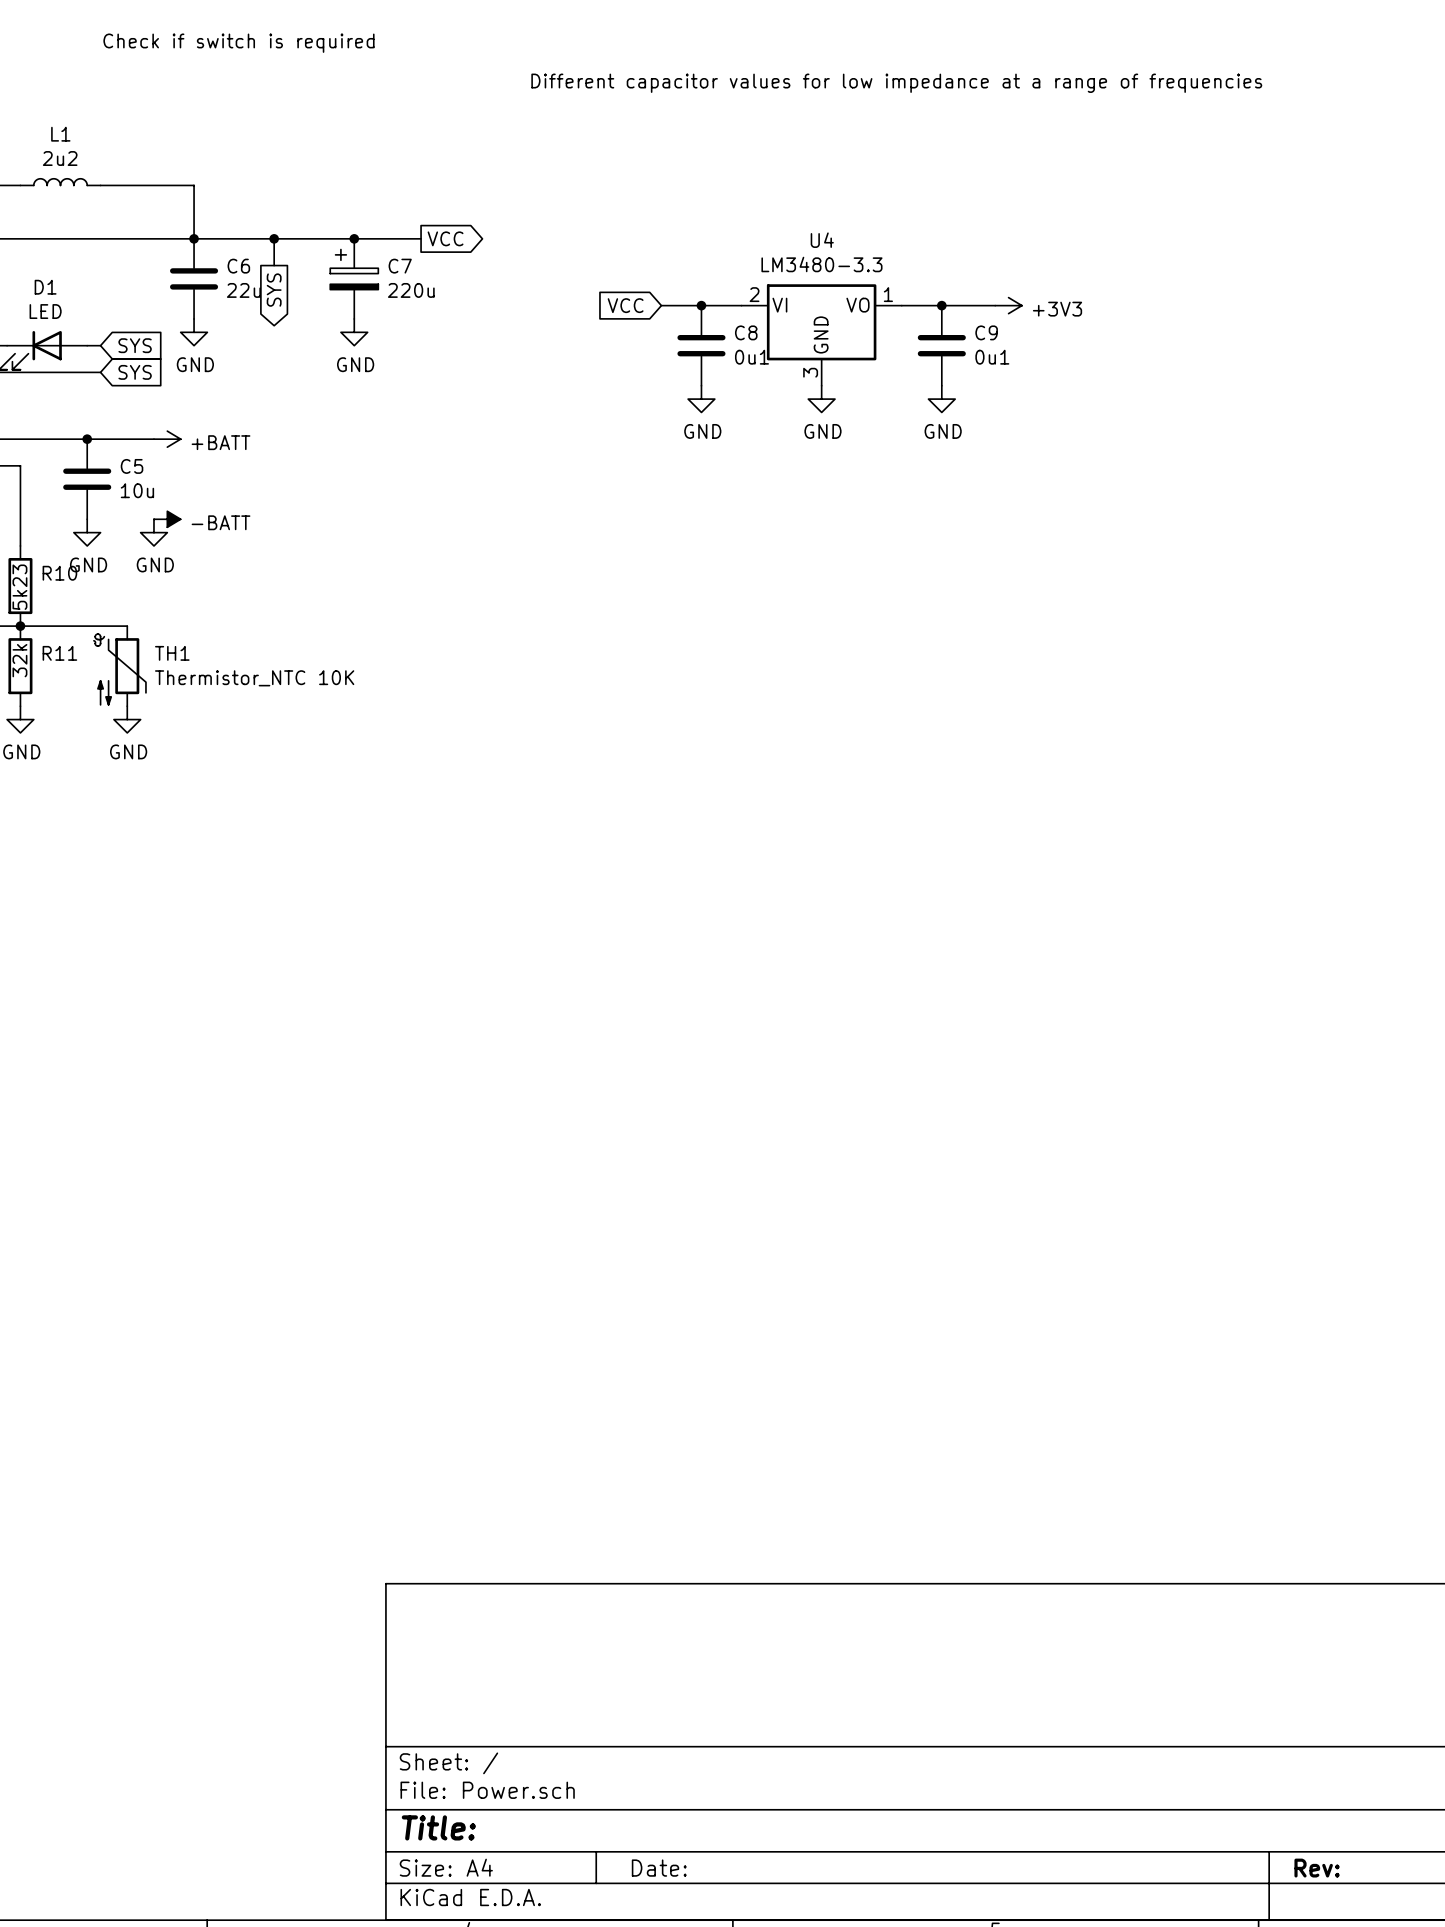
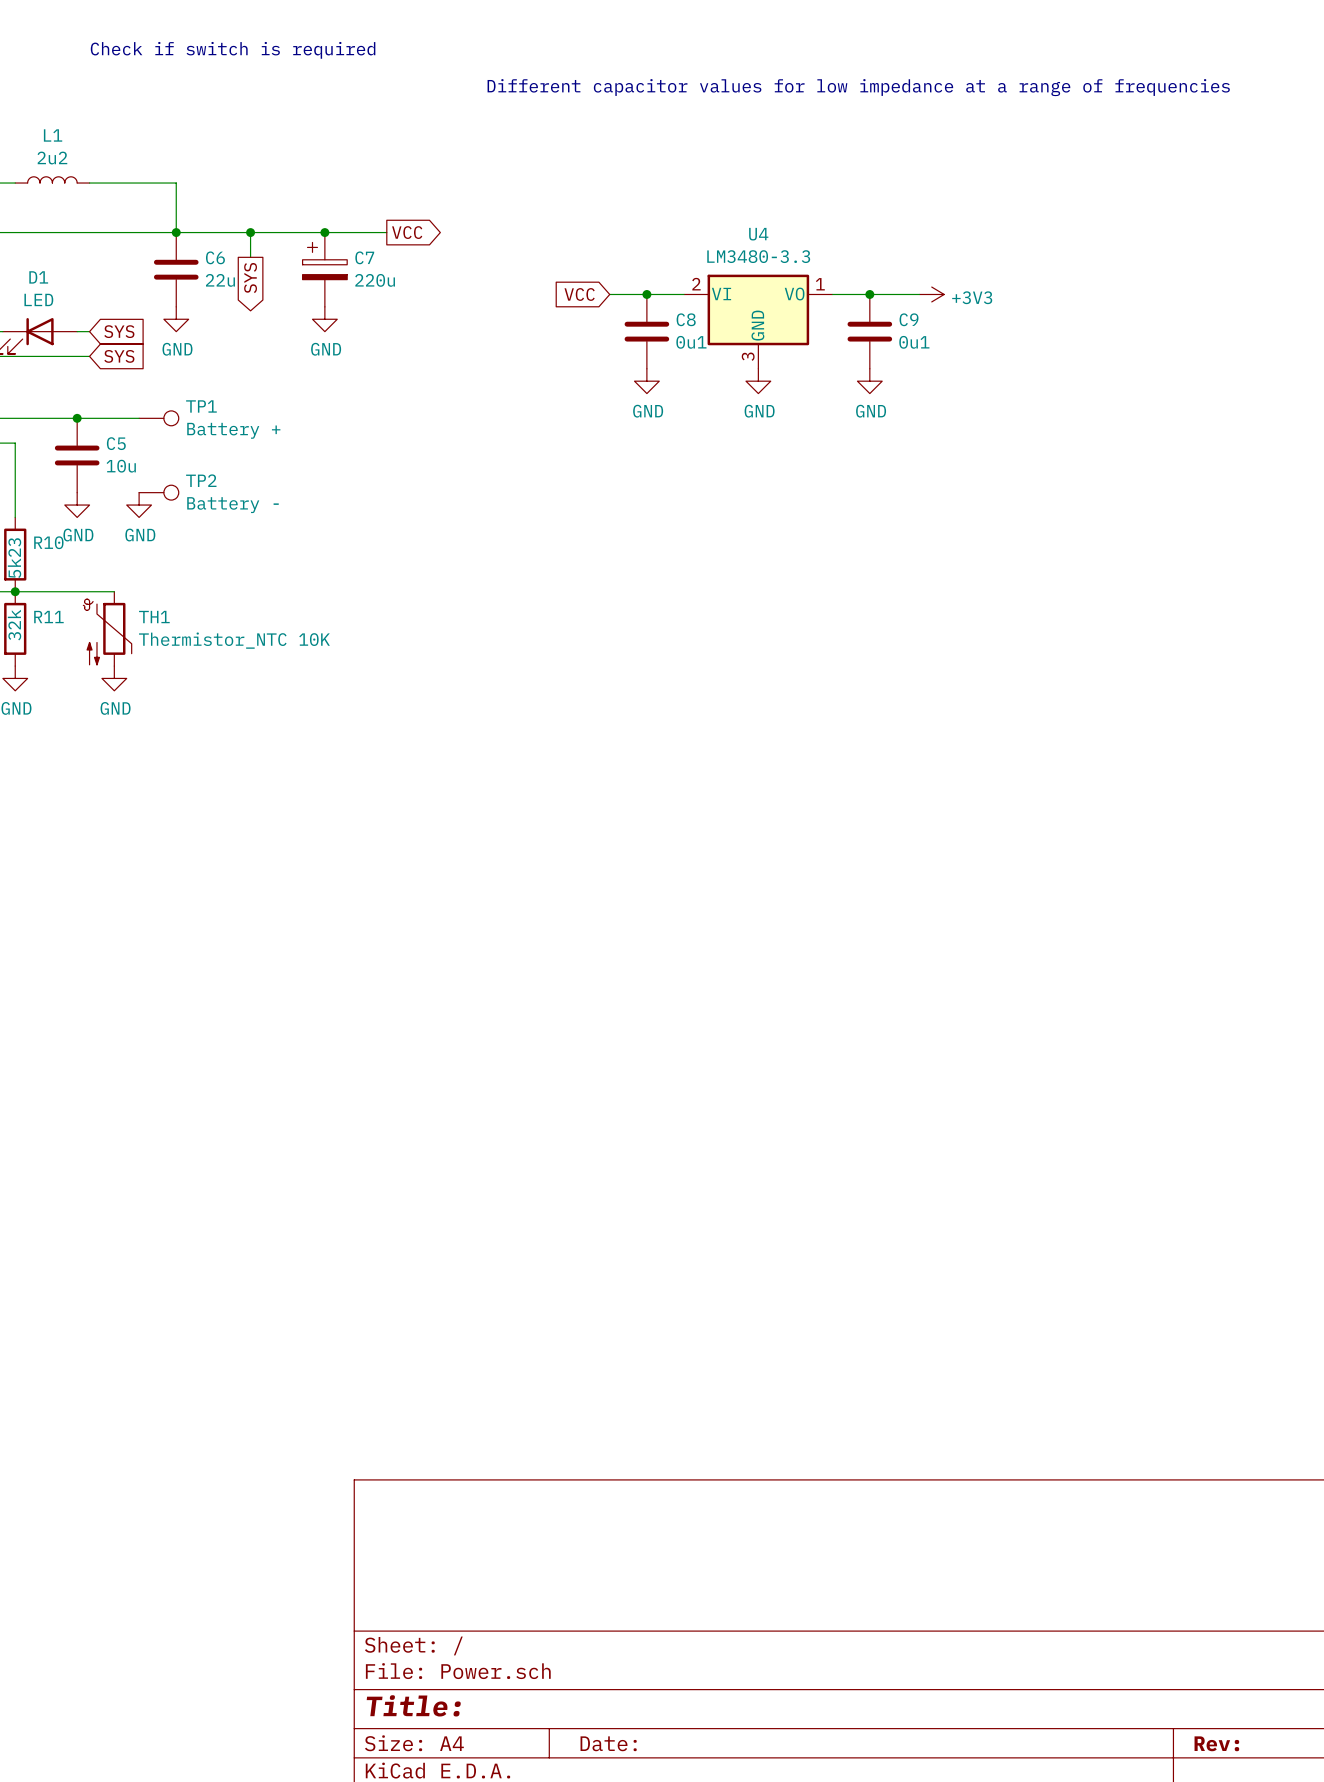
power symbol: +BATT (167, 439) -> none
TP1: none -> Battery + (158, 418)
power symbol: -BATT (167, 519) -> none
TP2: none -> Battery - (158, 492)

